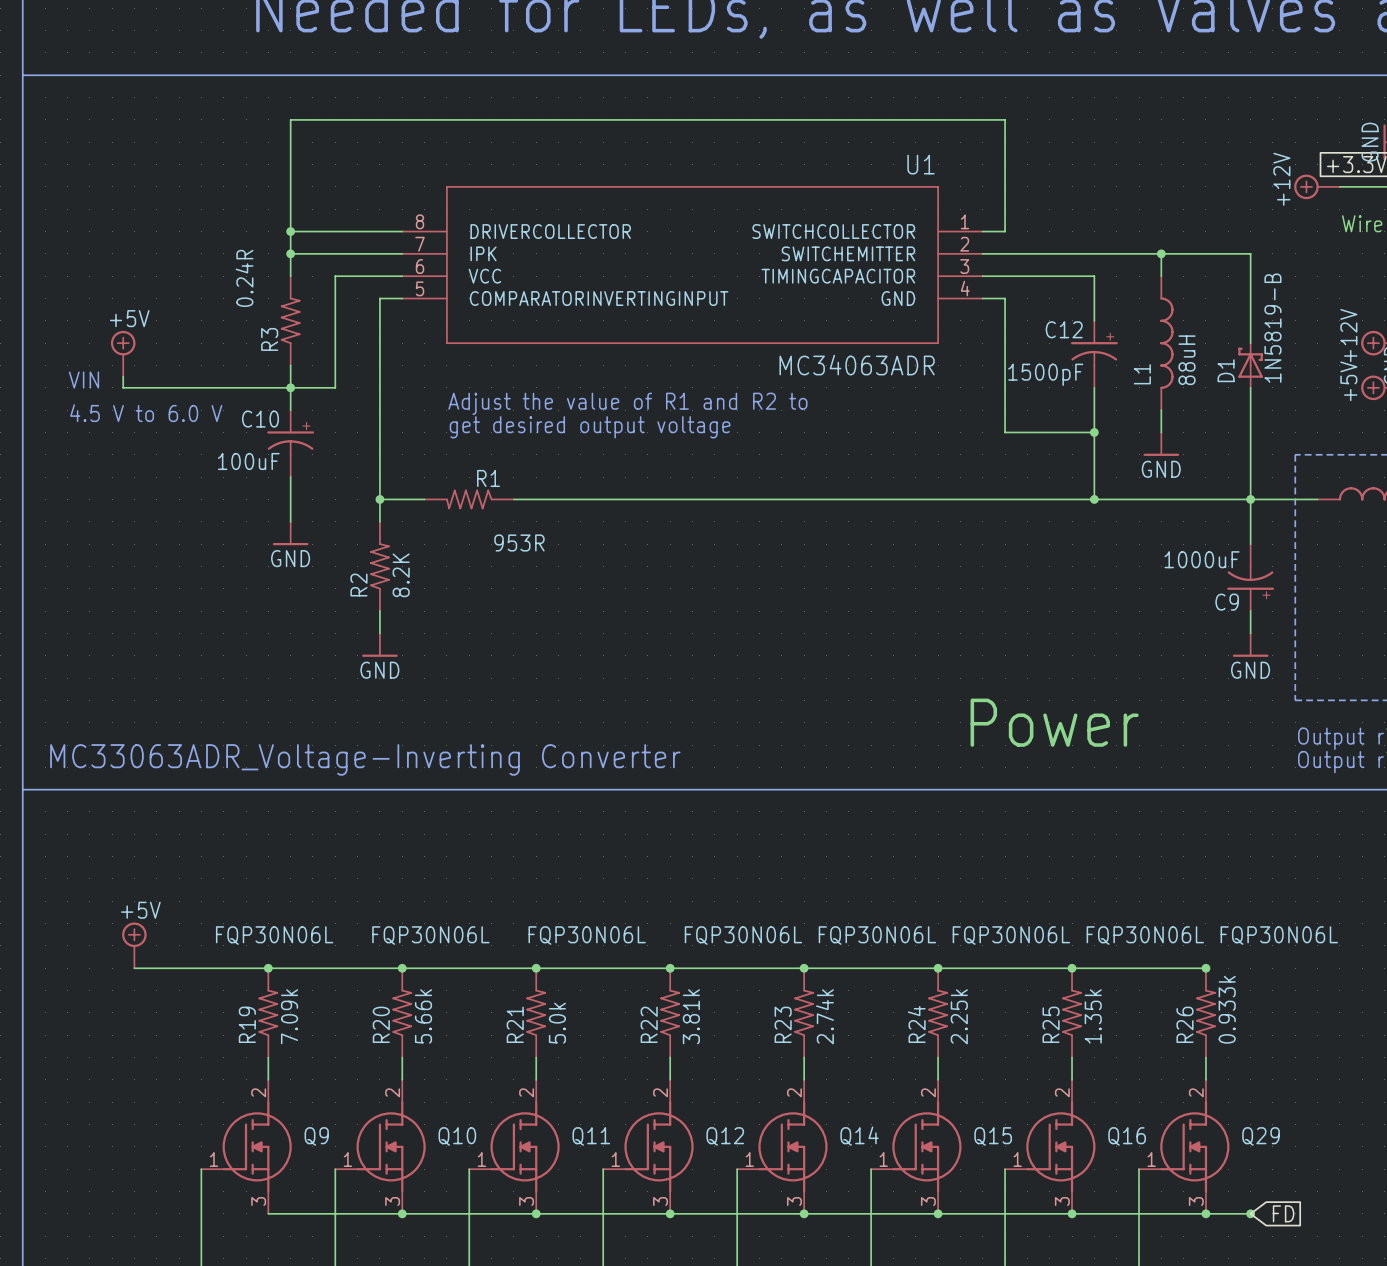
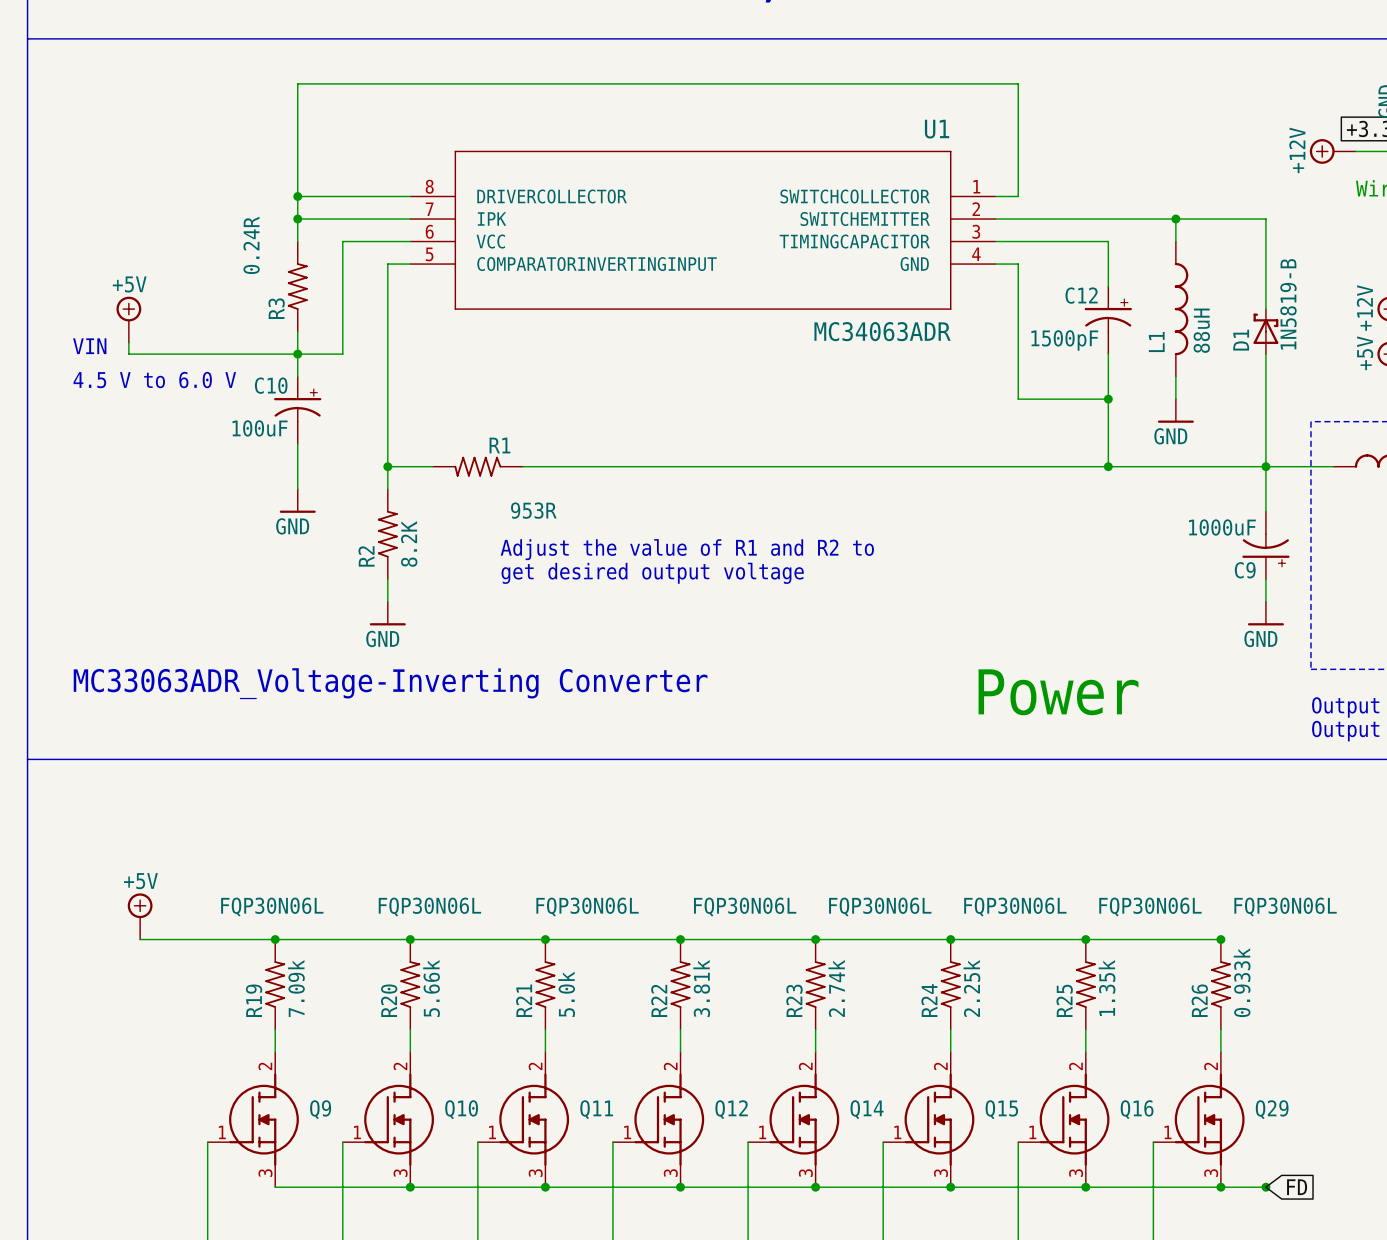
text position: Adjust the value of R1 and R2 to (627, 403) -> Adjust the value of R1 and R2 to (687, 549)
text position: get desired output voltage (590, 427) -> get desired output voltage (652, 573)
text position: MC33063ADR_Voltage-Inverting Converter (365, 759) -> MC33063ADR_Voltage-Inverting Converter (390, 683)

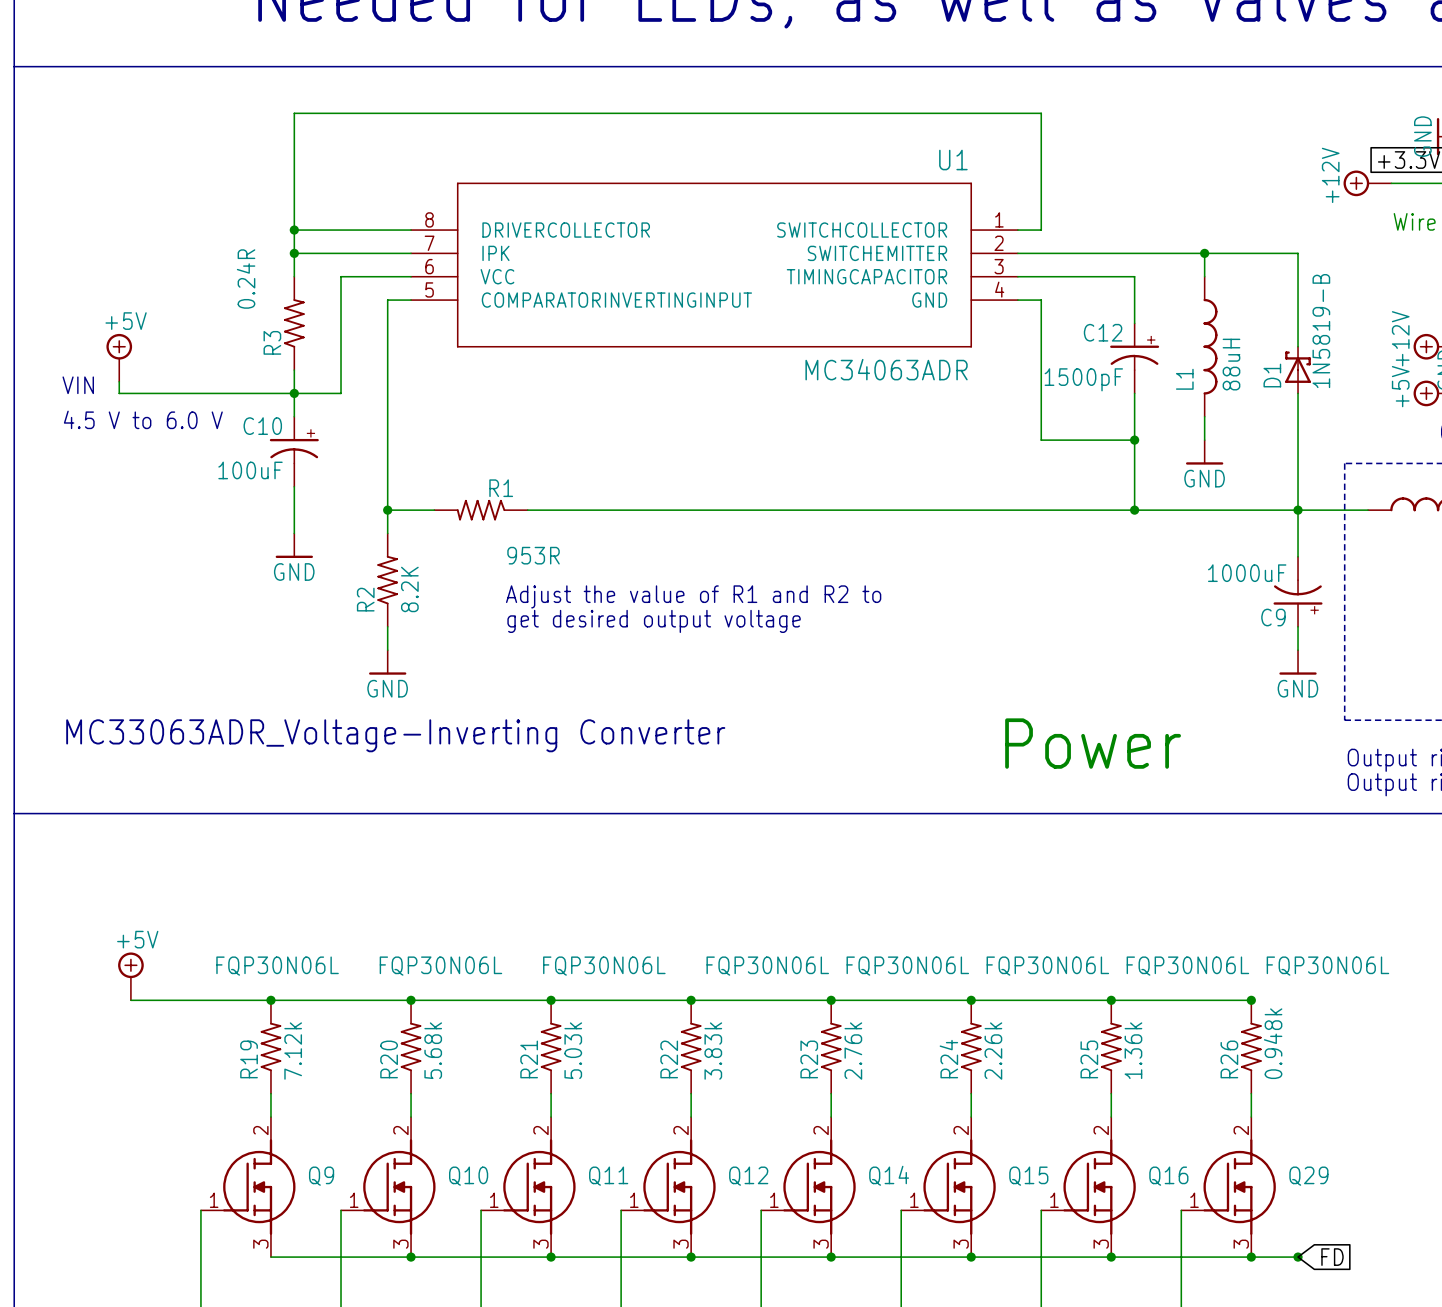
R26 value: 0.933k (1242, 982) -> 0.948k (1273, 1043)
R19 value: 7.09k (296, 988) -> 7.12k (293, 1051)
R20 value: 5.66k (431, 988) -> 5.68k (433, 1050)
R22 value: 3.81k (701, 988) -> 3.83k (713, 1051)
R23 value: 2.74k (836, 988) -> 2.76k (853, 1051)
R24 value: 2.25k (971, 988) -> 2.26k (993, 1051)
R25 value: 1.35k (1107, 988) -> 1.36k (1133, 1050)
R21 value: 5.0k (566, 994) -> 5.03k (573, 1050)

